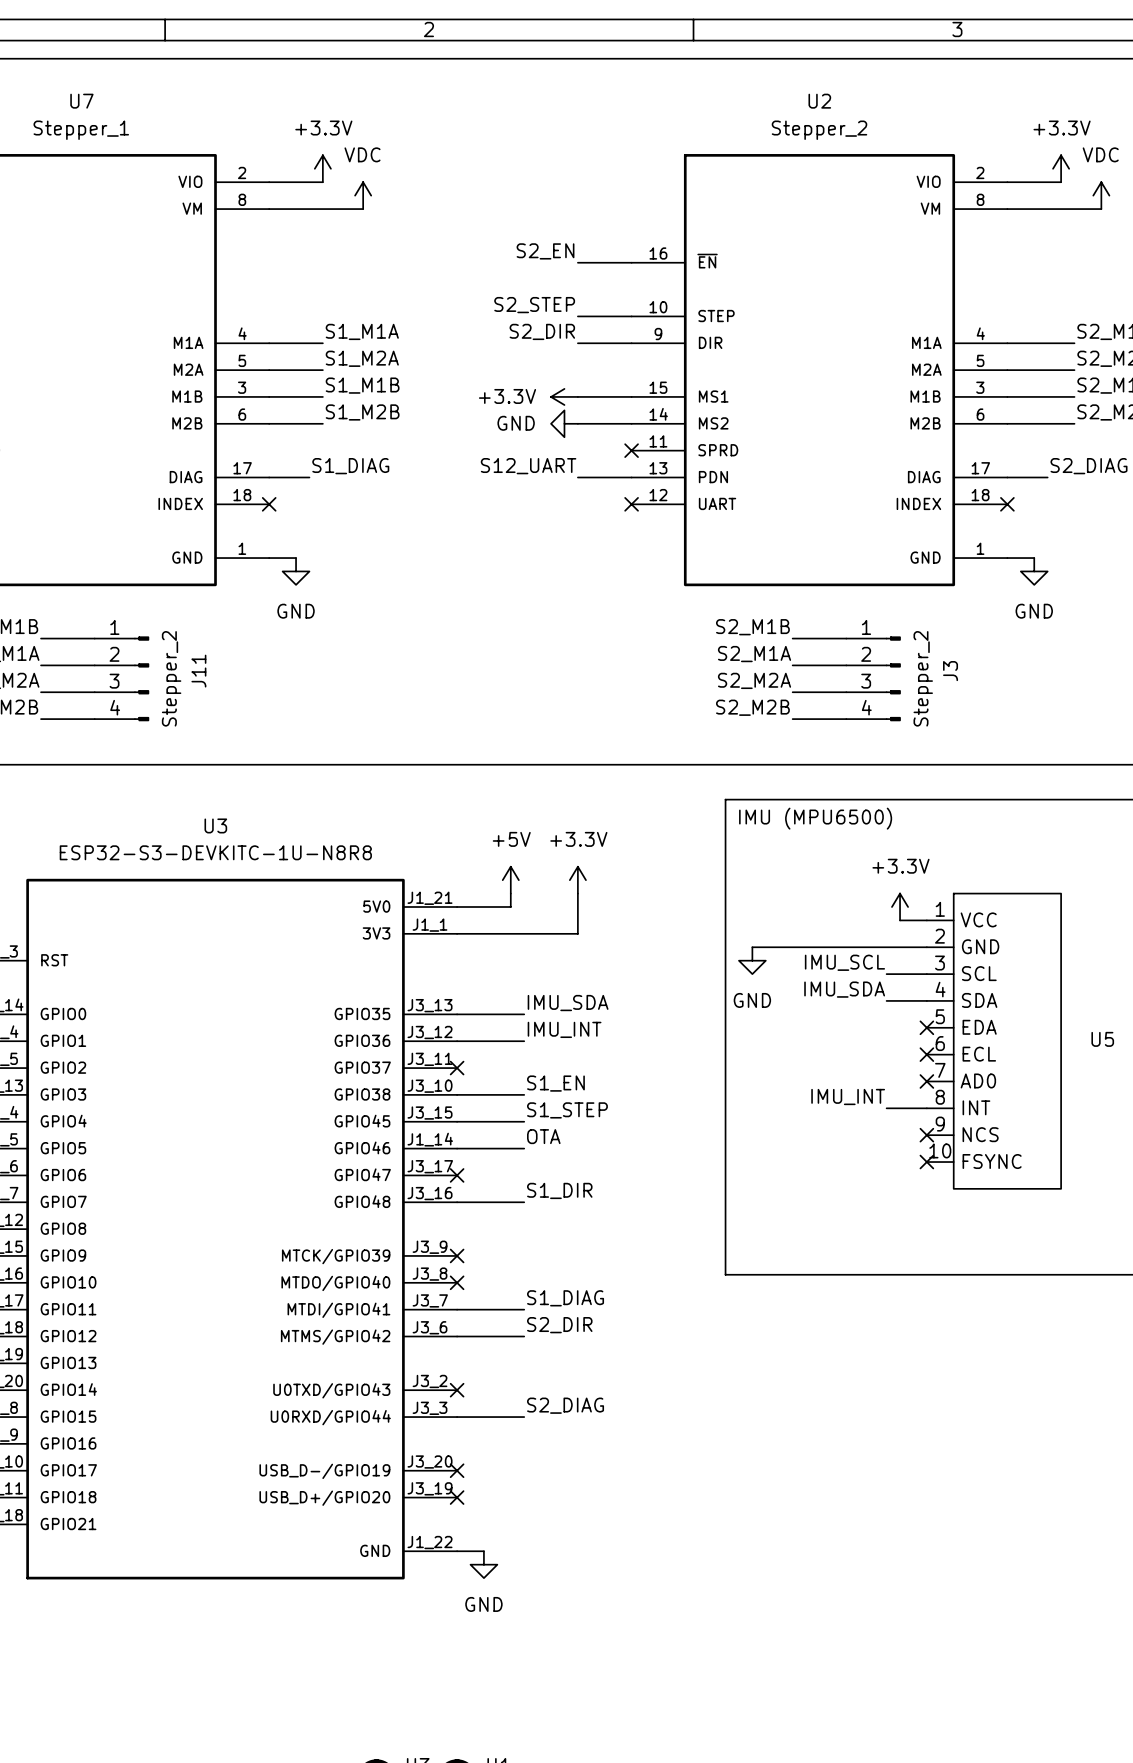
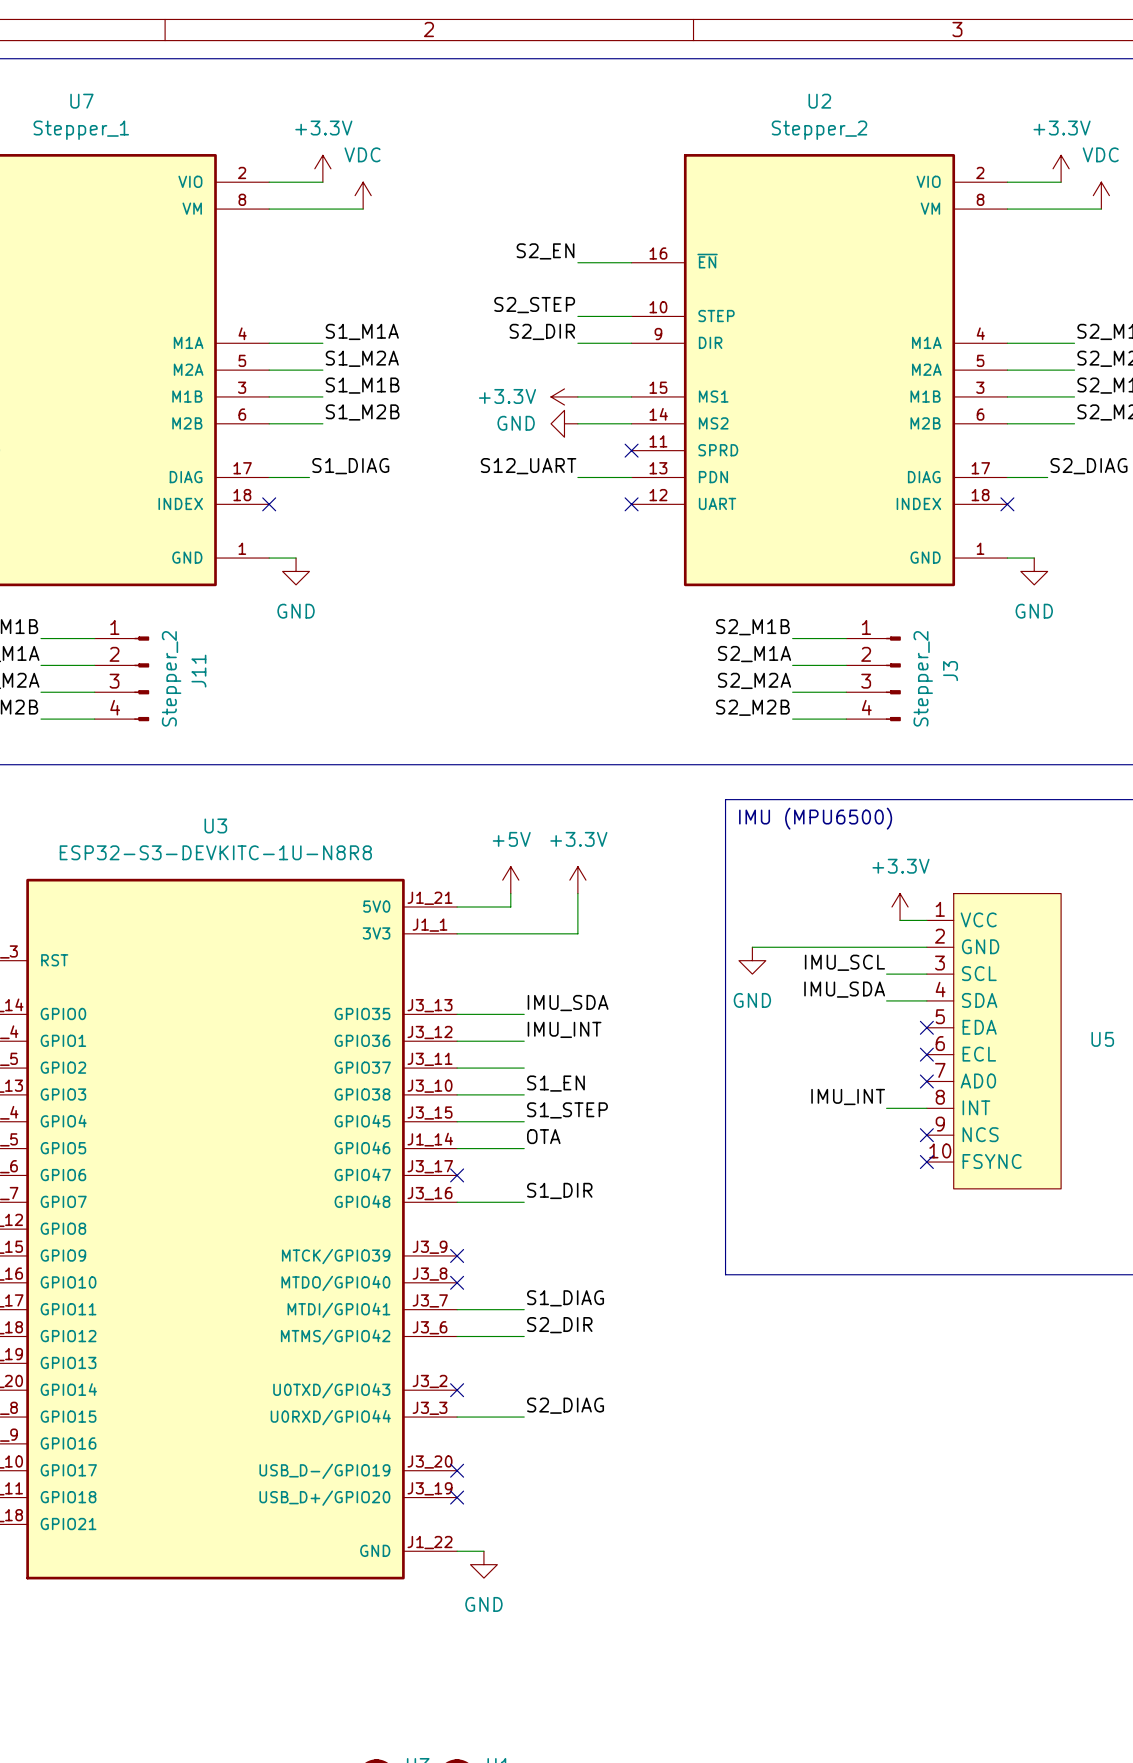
wire: none -> (457, 1068) (524, 1068)
no-connect mark: (457, 1068) -> none

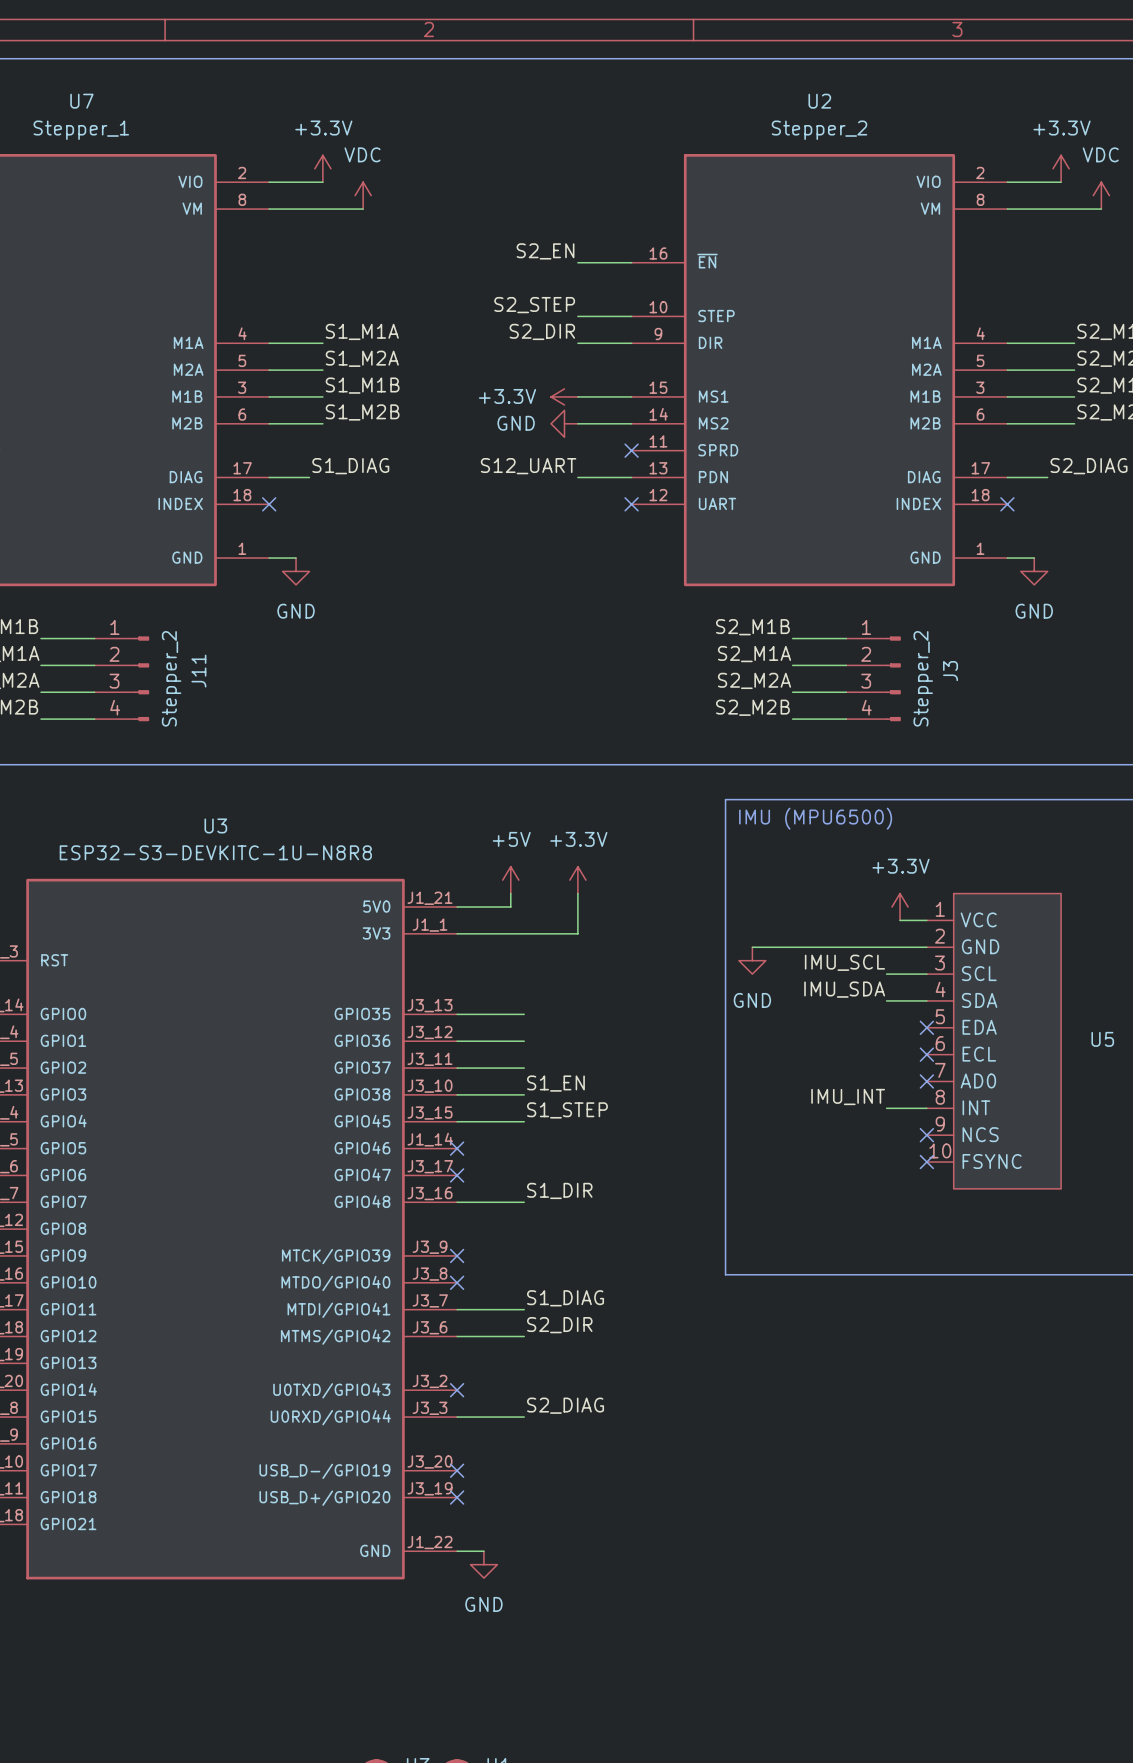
label: IMU_SDA (568, 1003) -> none
label: IMU_INT (564, 1029) -> none
label: OTA (543, 1136) -> none
wire: (457, 1148) (524, 1148) -> none
no-connect mark: none -> (457, 1148)

